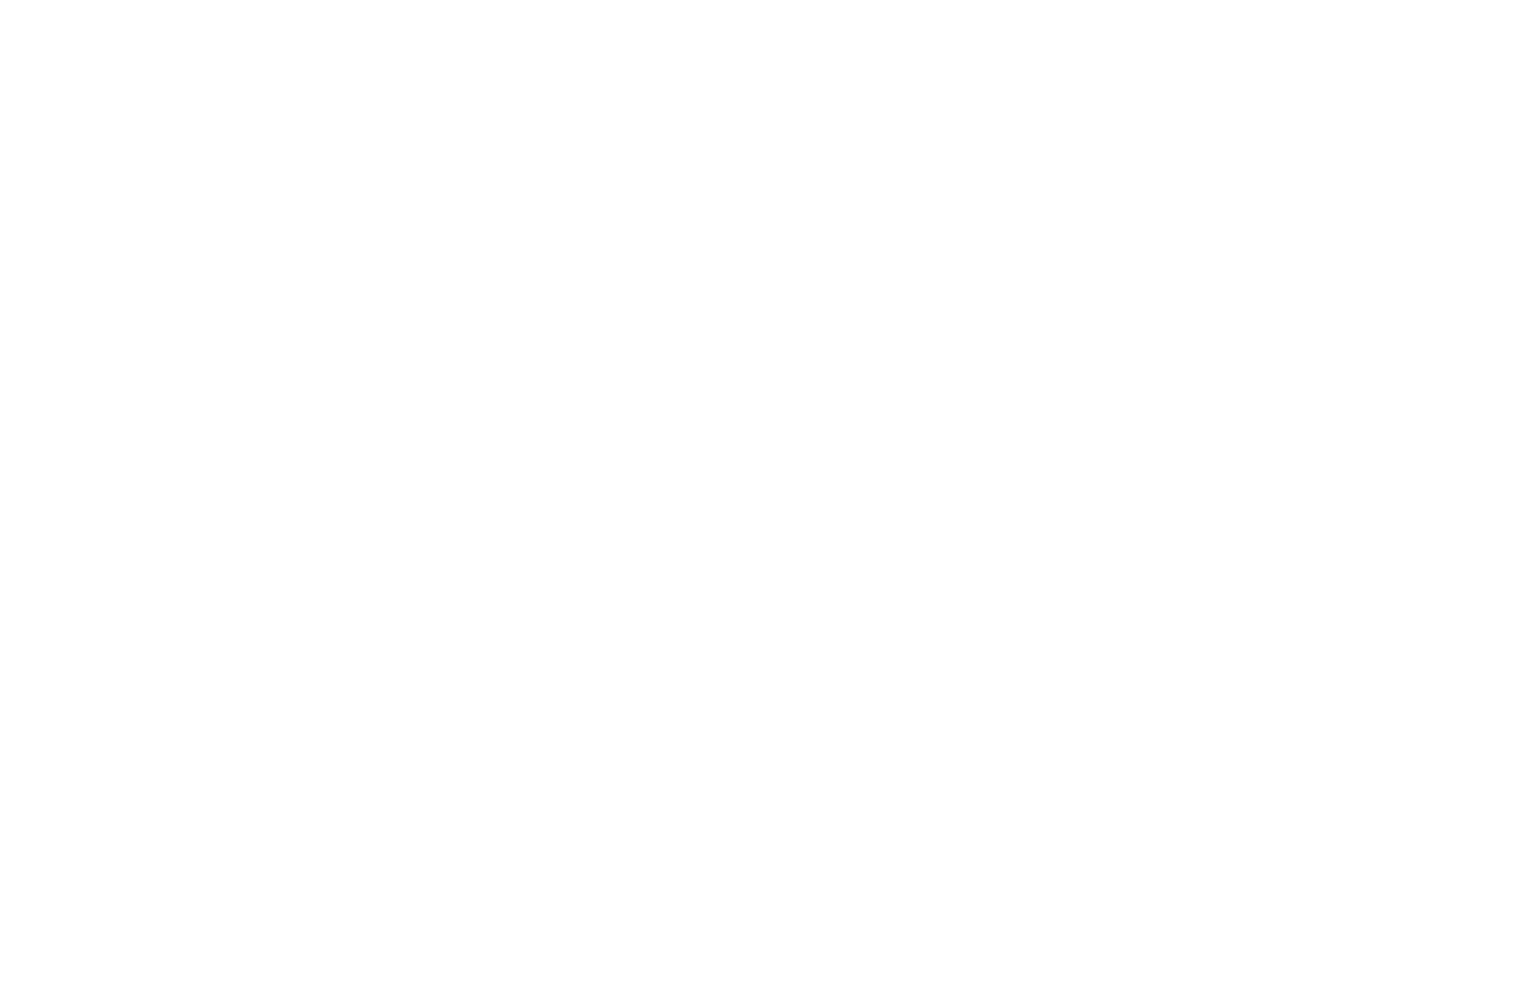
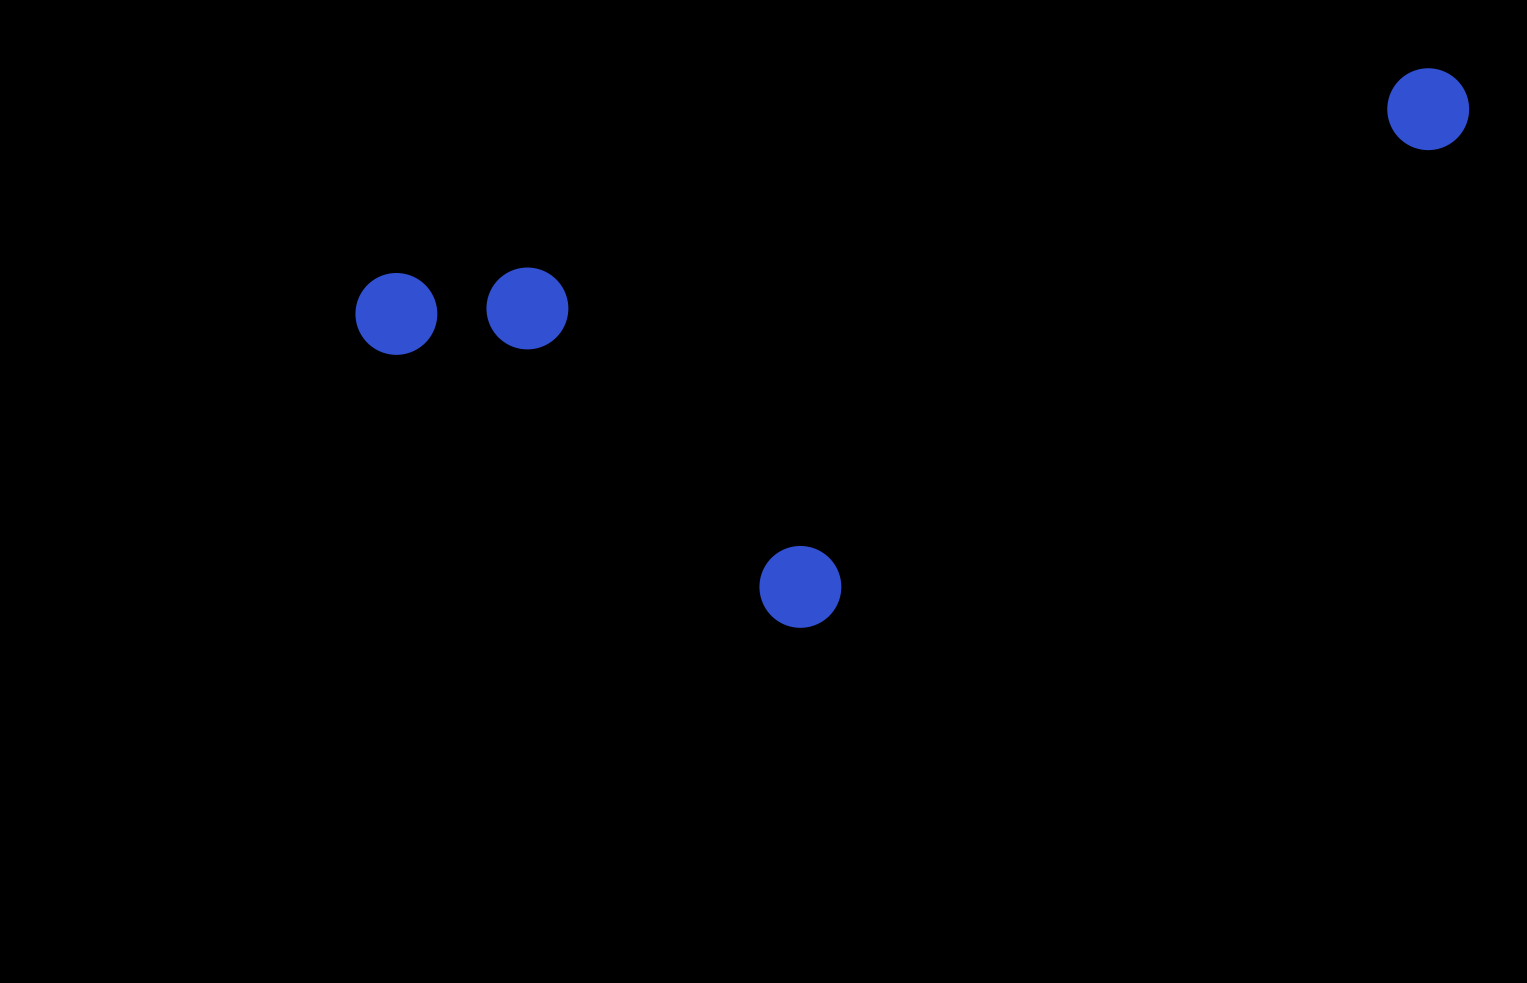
part: none -> (1428, 109)
part: none -> (527, 308)
part: none -> (396, 313)
part: none -> (800, 586)

